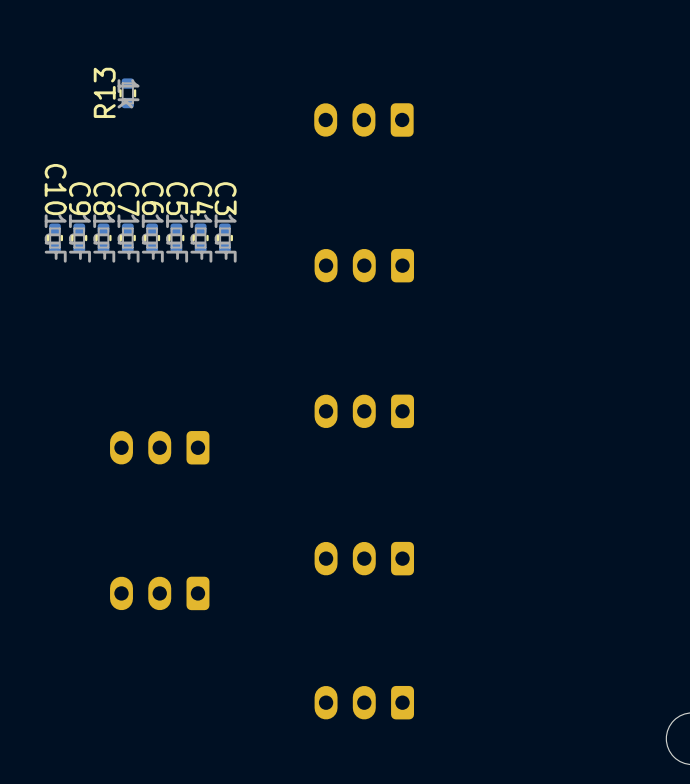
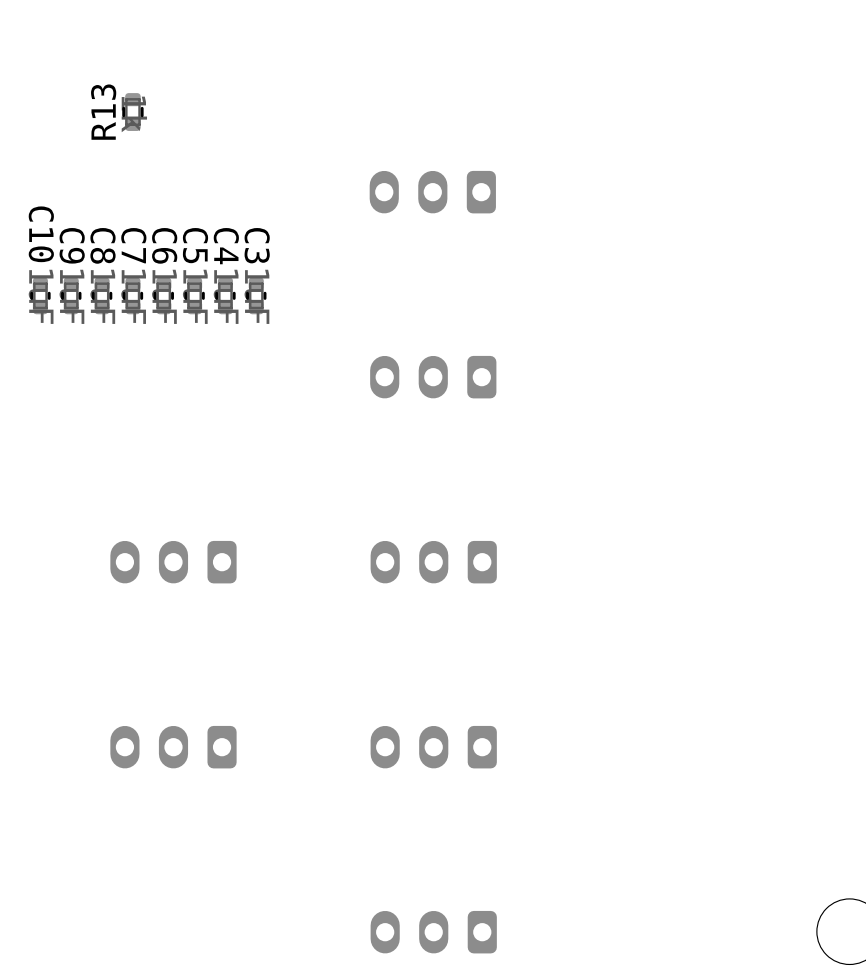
part position: (363, 119) -> (432, 192)
part position: (364, 265) -> (433, 377)
part position: (364, 411) -> (433, 562)
part position: (364, 558) -> (433, 747)
part position: (364, 702) -> (433, 932)

